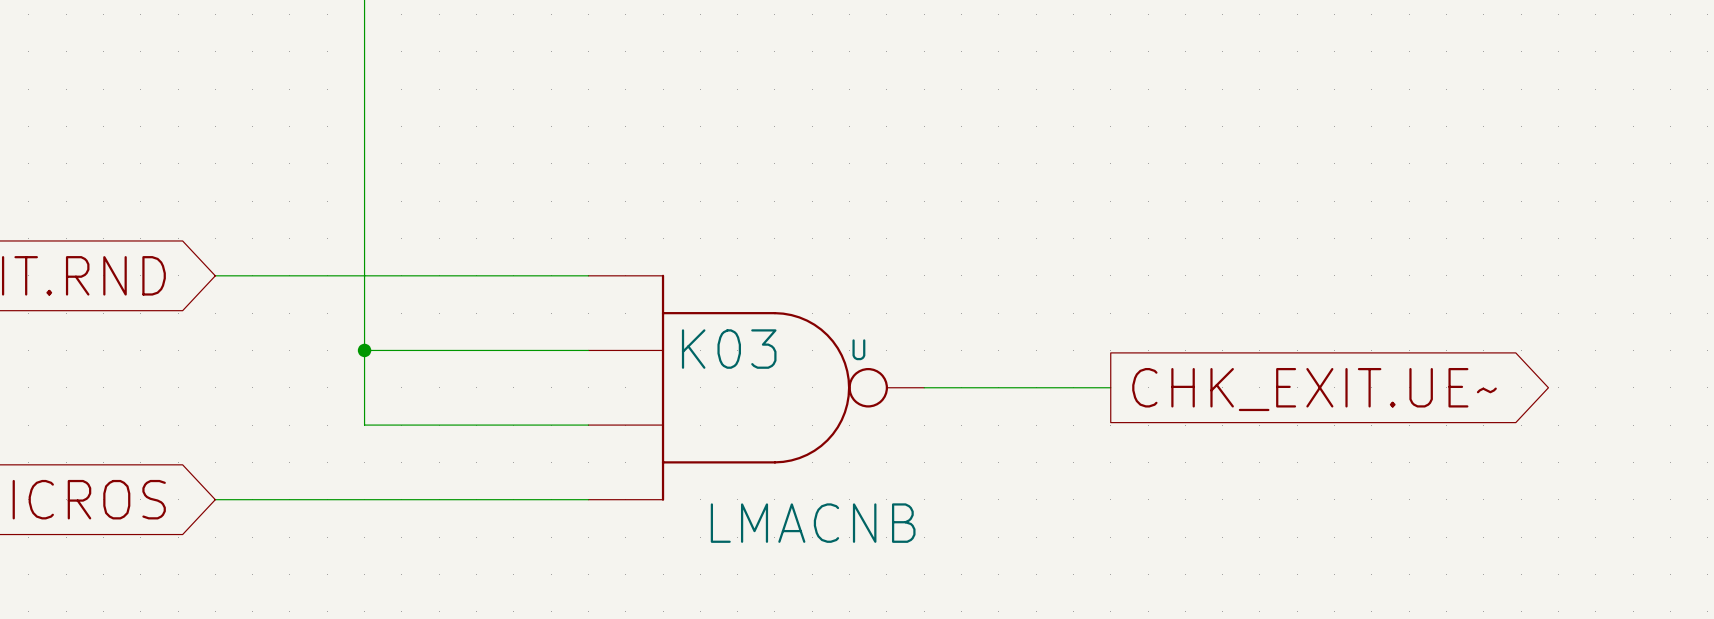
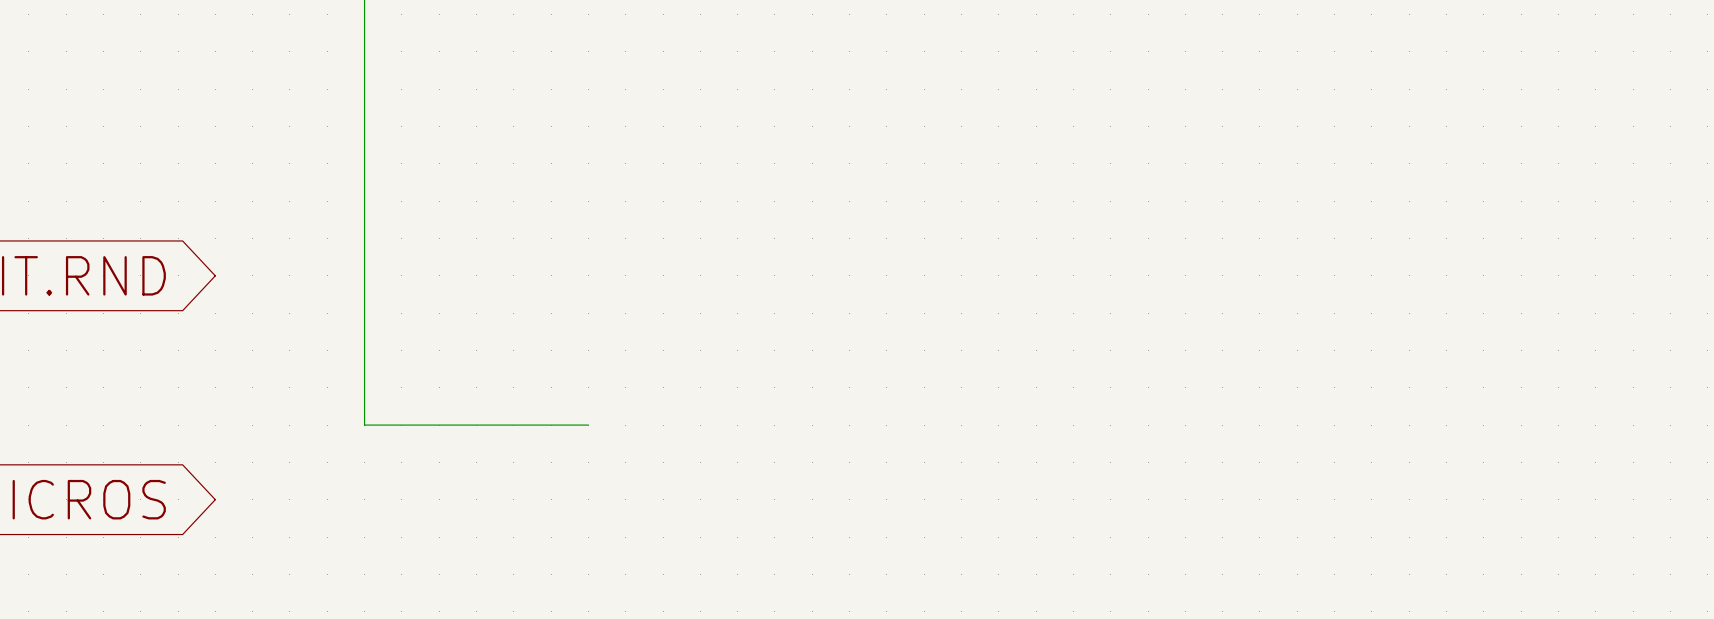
wire: (215, 275) (588, 275) -> none
wire: (364, 350) (588, 350) -> none
junction: (364, 350) -> none
U: (756, 387) -> none
wire: (924, 387) (1110, 387) -> none
global label: CHK_EXIT.UE~ (1314, 389) -> none
wire: (215, 499) (588, 499) -> none

